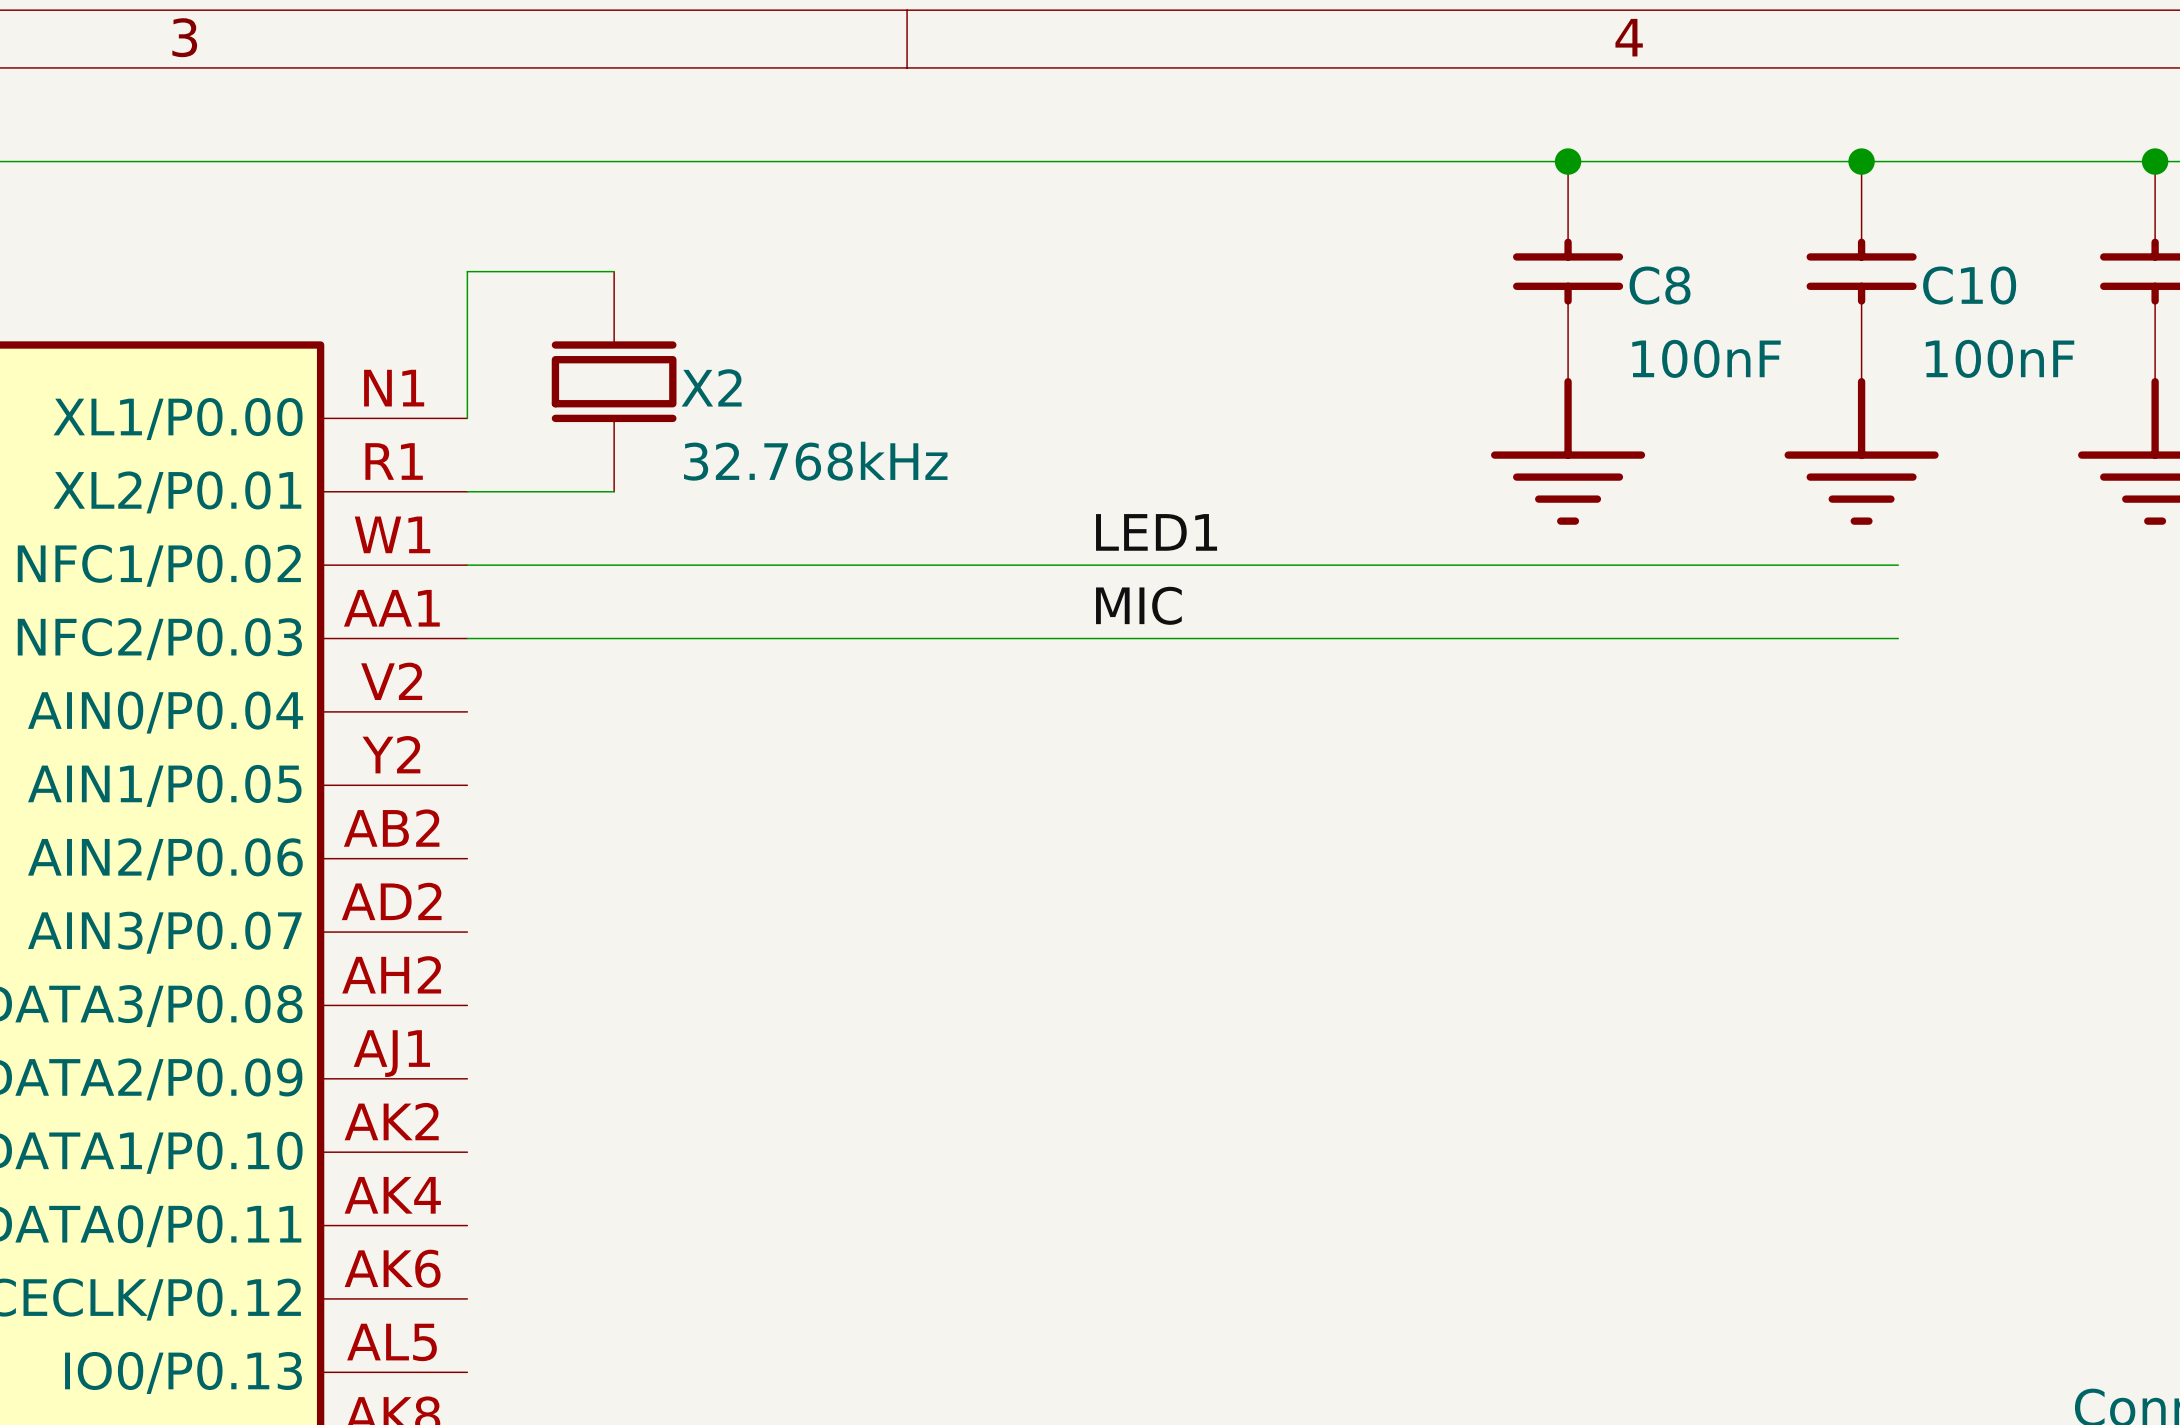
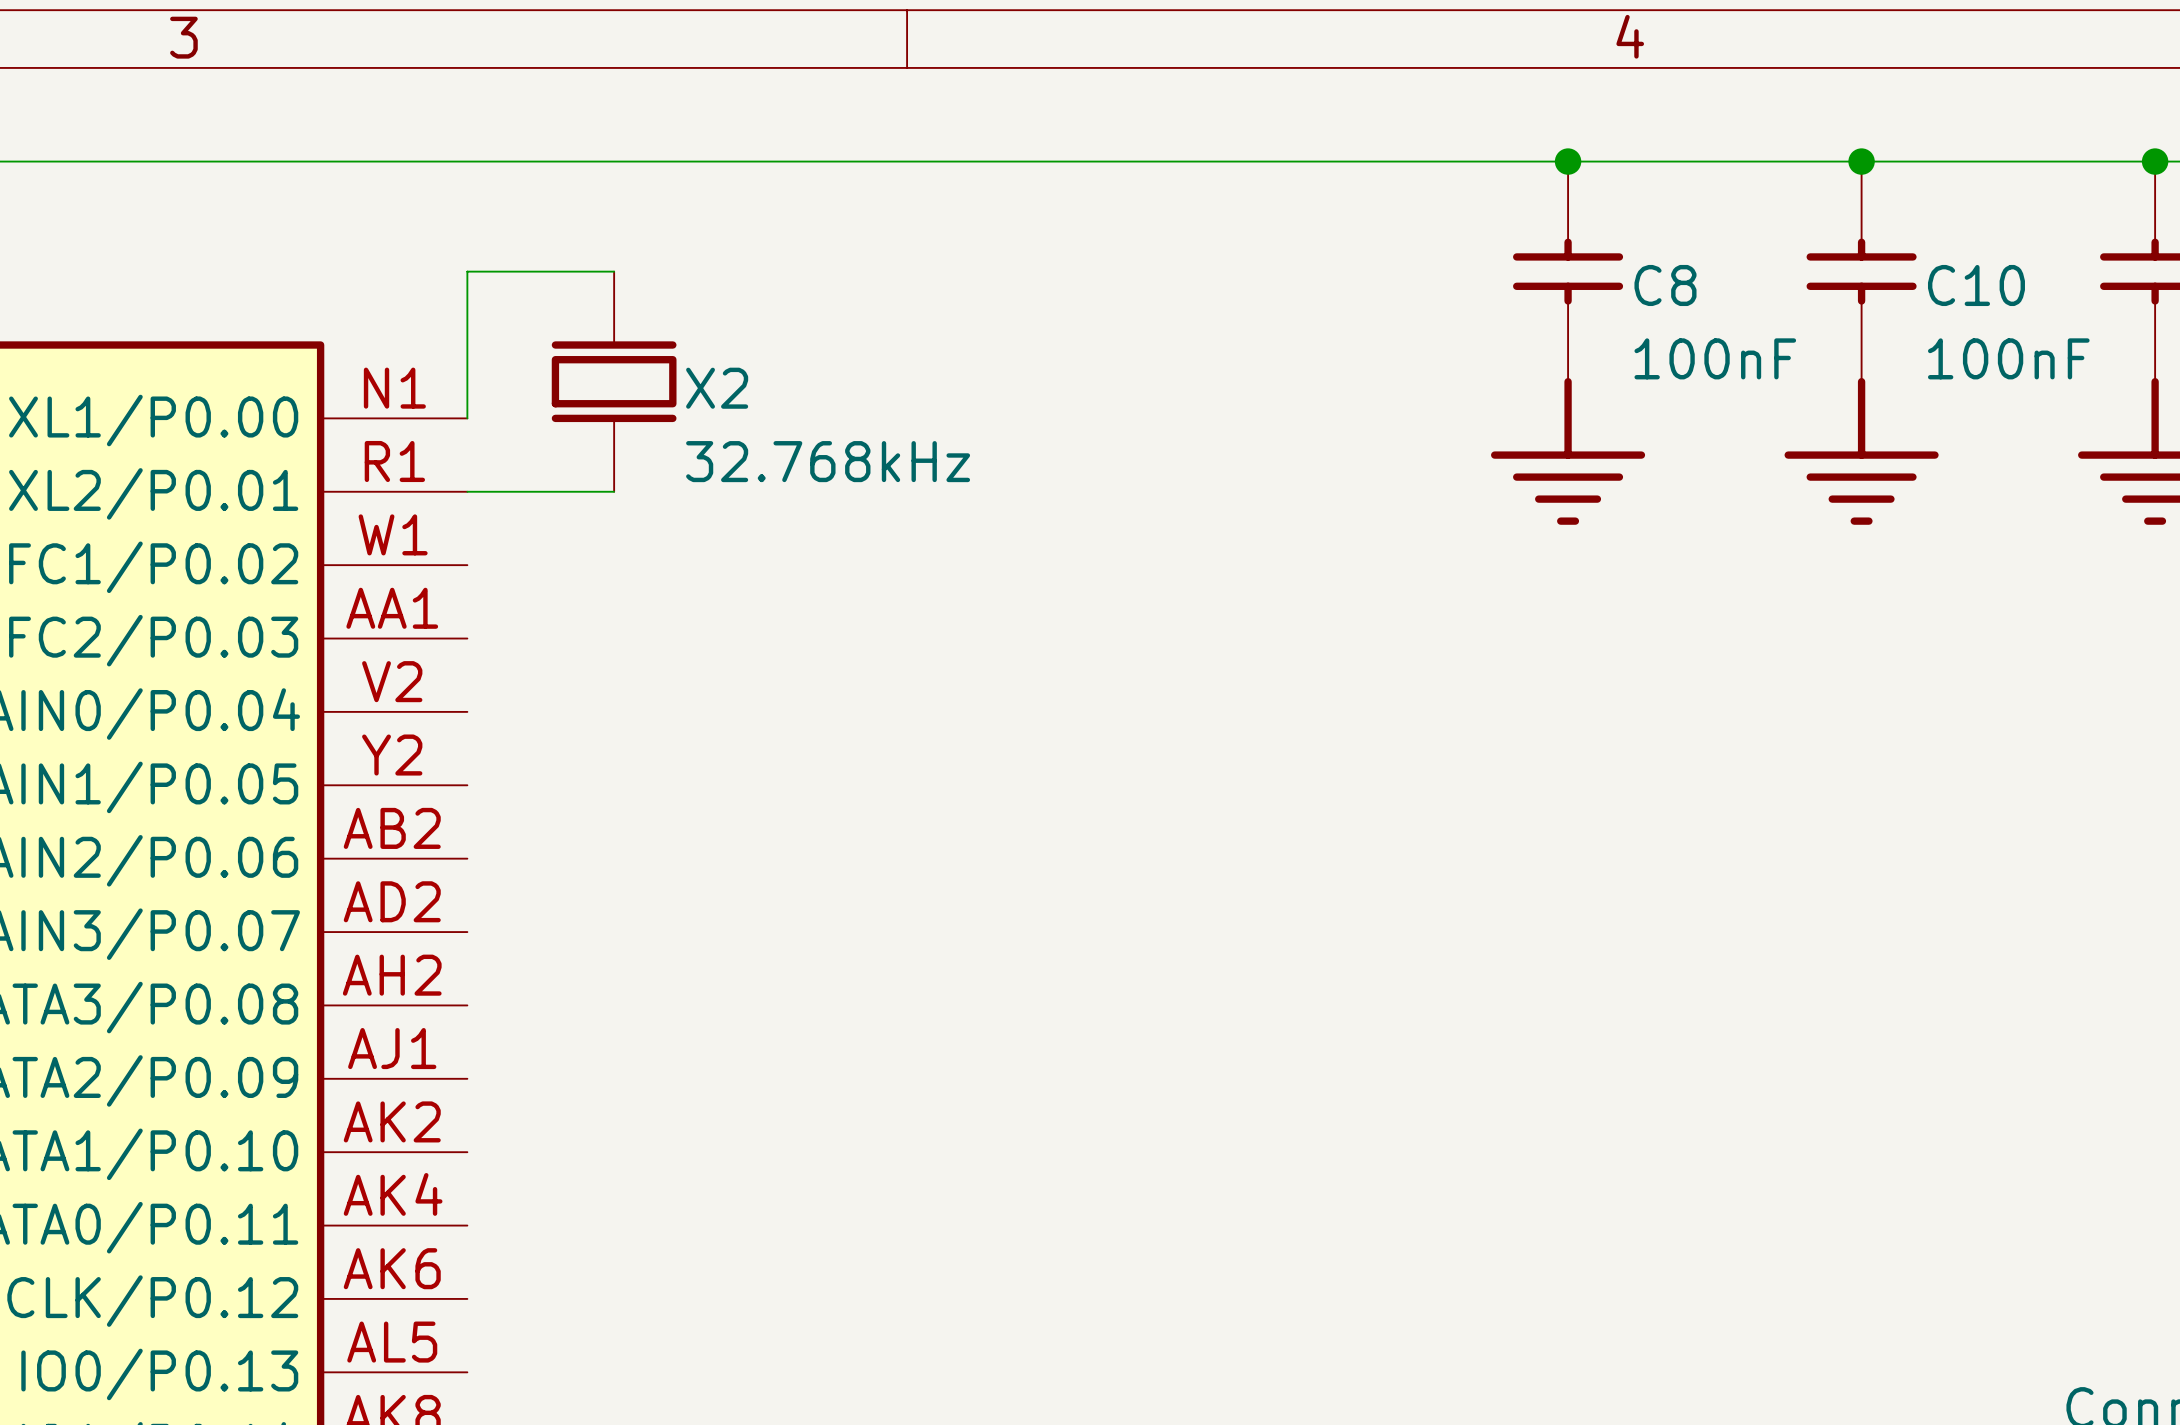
label: LED1 (1156, 532) -> none
wire: (467, 565) (1898, 565) -> none
label: MIC (1138, 605) -> none
wire: (467, 638) (1898, 638) -> none

